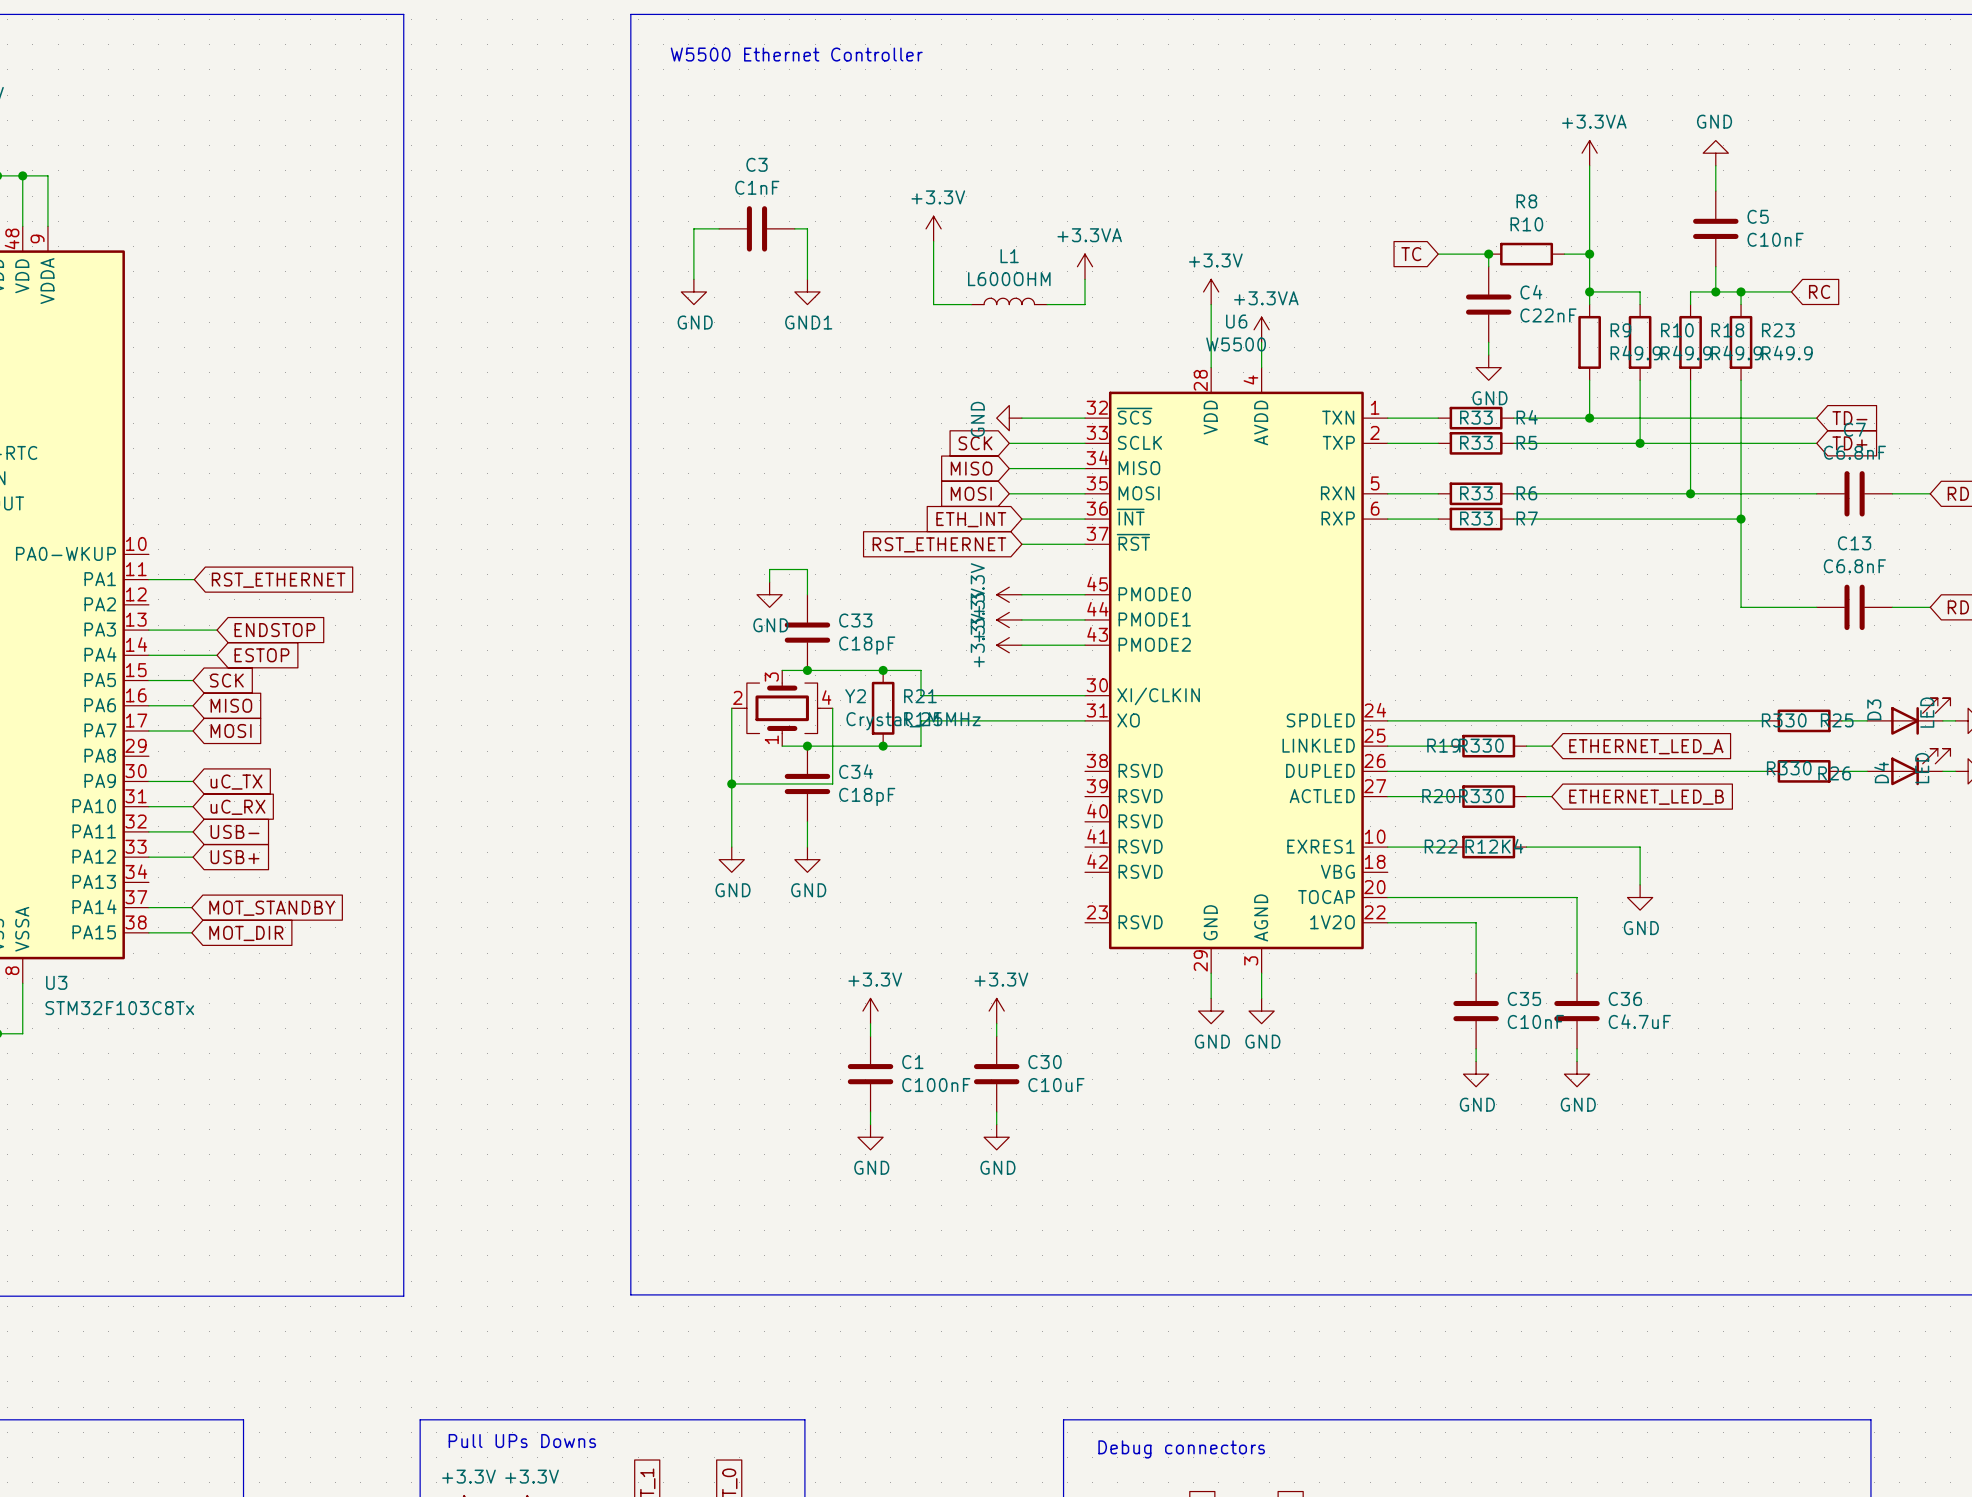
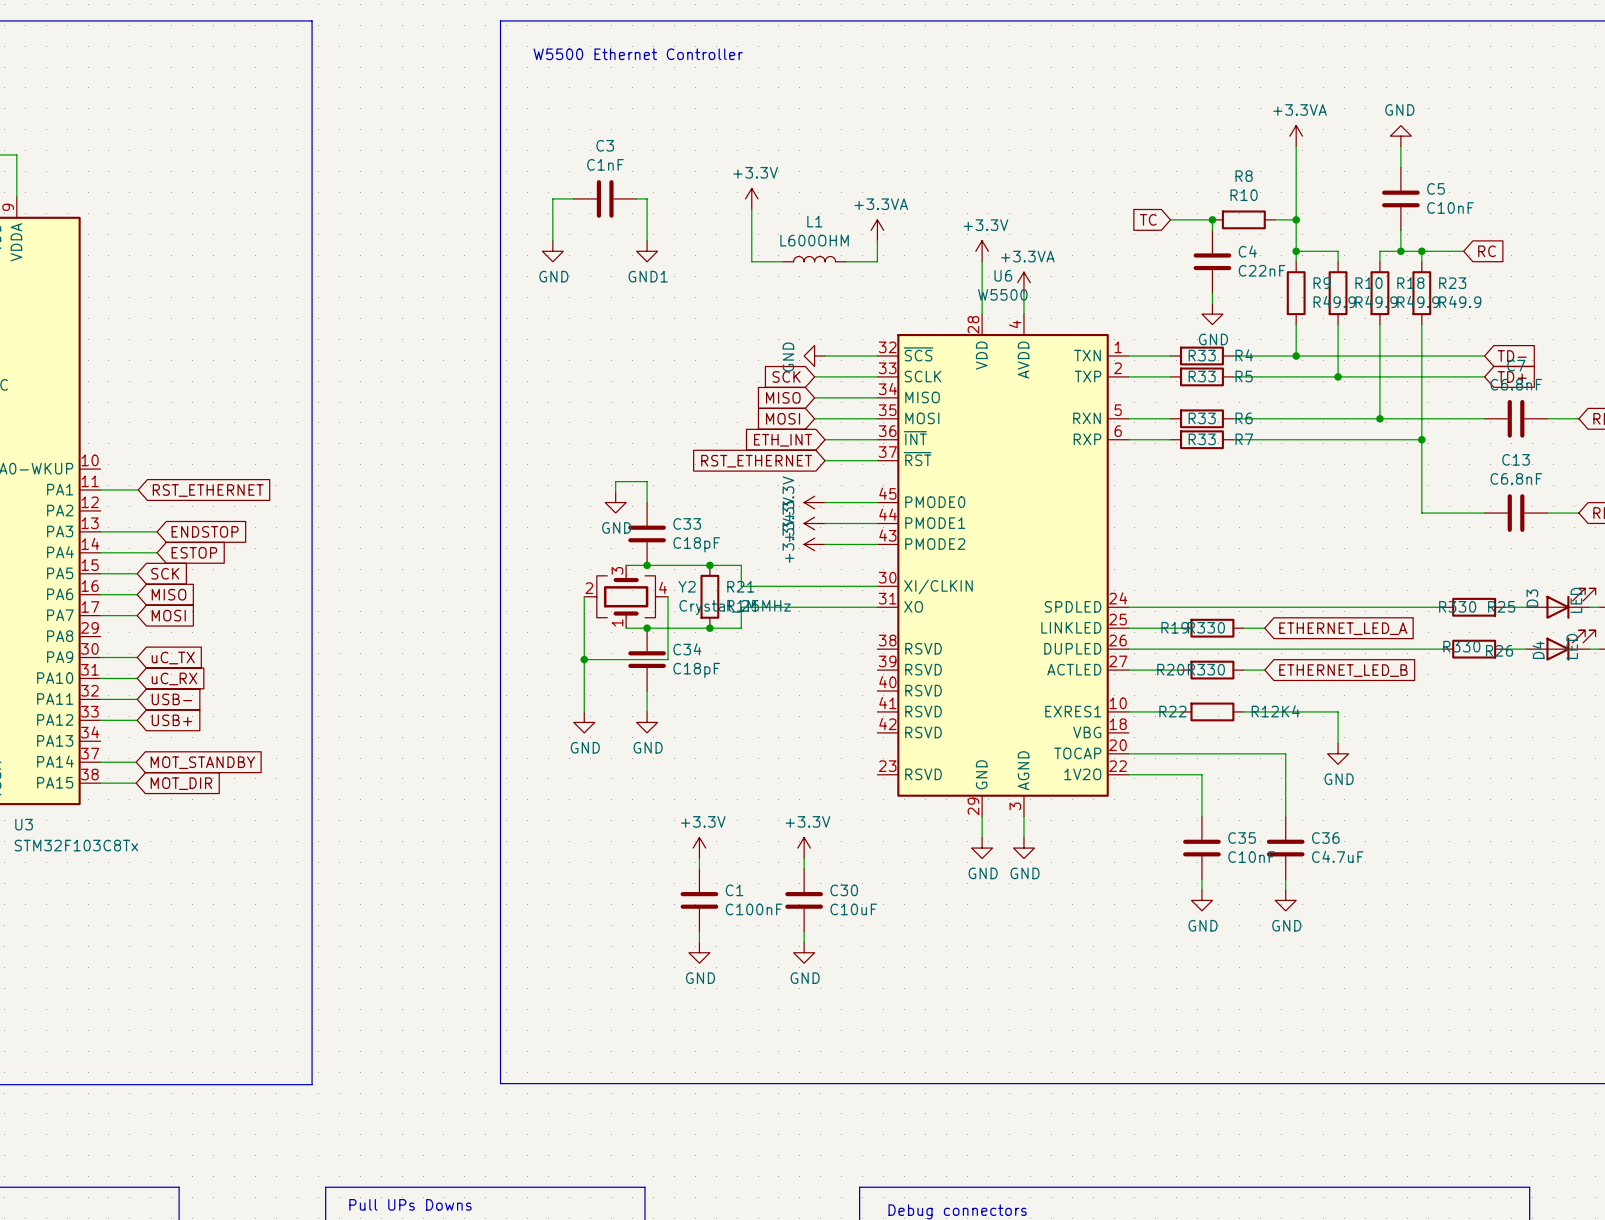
R22 value position: R12K4 (1494, 846) -> R12K4 (1275, 711)

